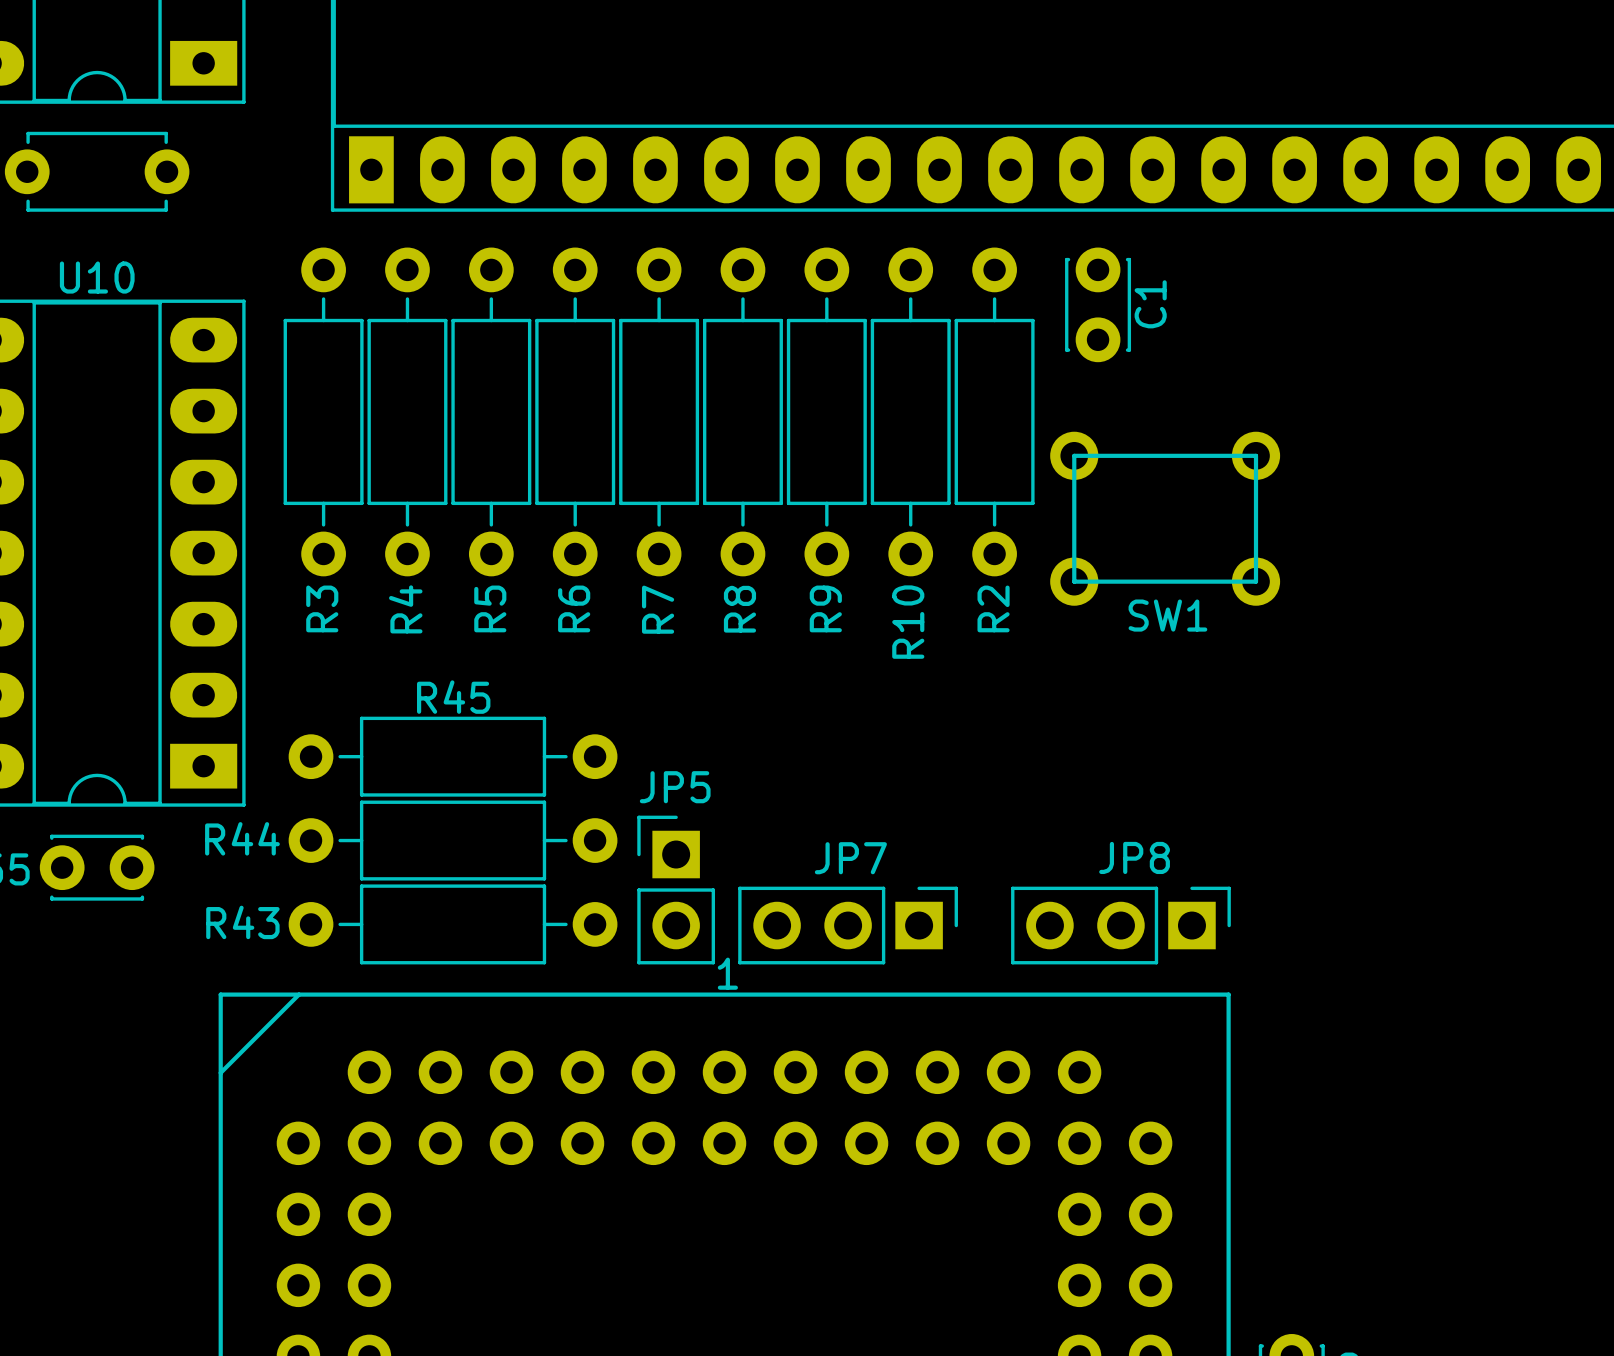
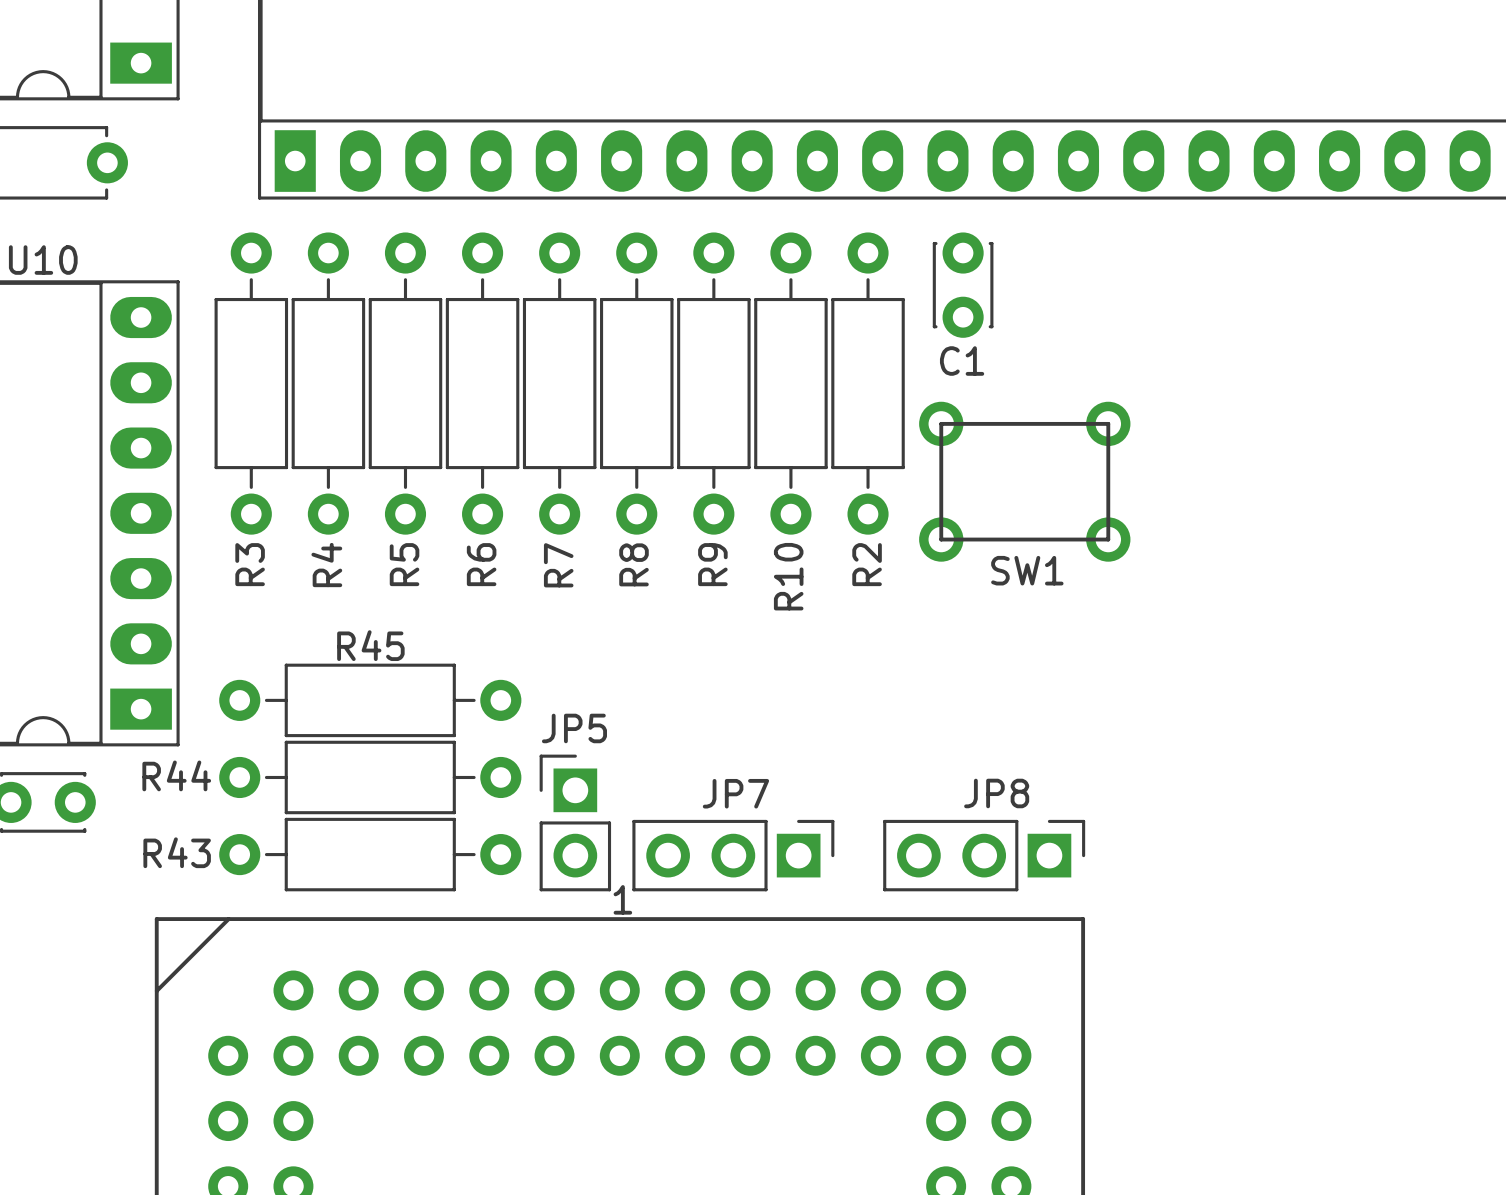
C1 name rotation: 0° (1150, 304) -> 90° clockwise (962, 361)
C1 name position: C1 (1150, 304) -> C1 (962, 361)

